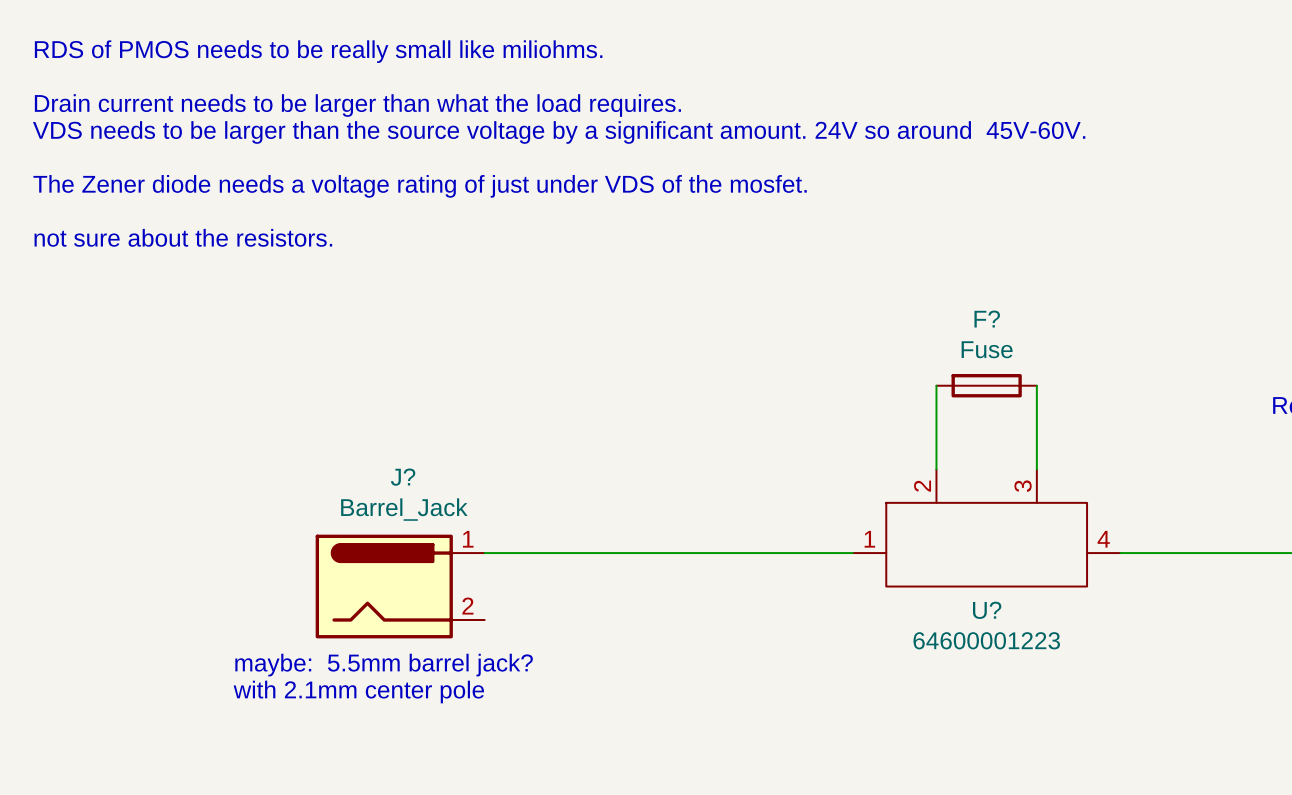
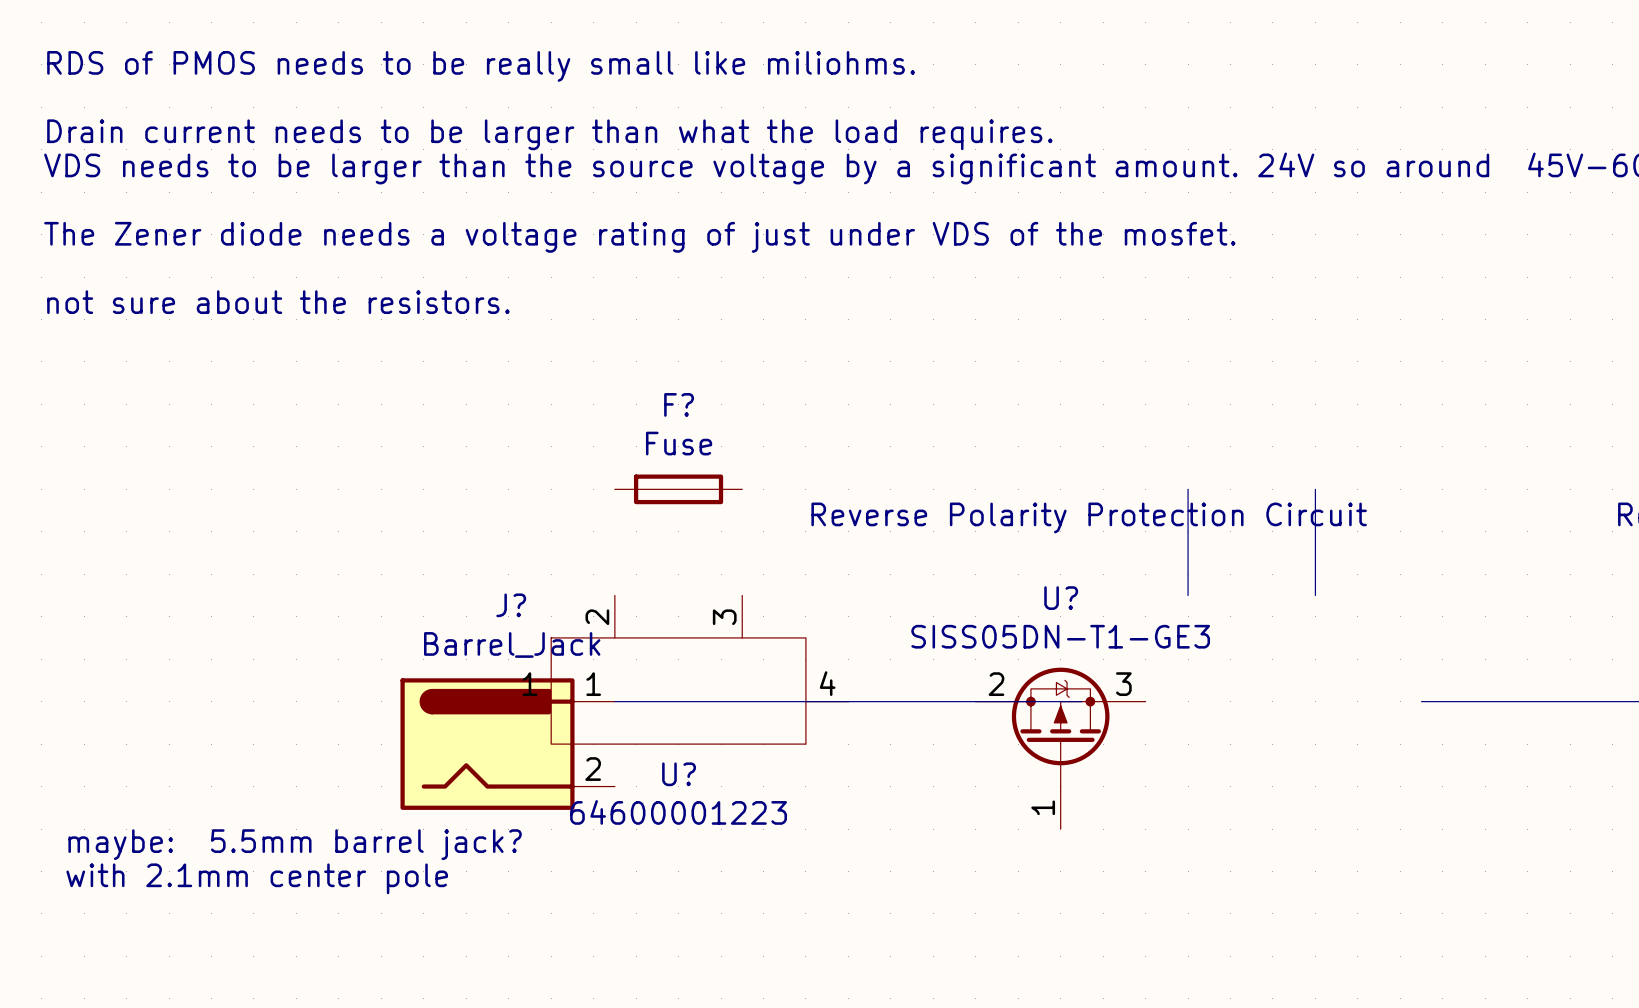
F?: none -> Fuse (678, 489)
F?: Fuse (986, 385) -> none
text: none -> Reverse Polarity Protection Circuit (1089, 517)
U?: none -> 64600001223 (678, 669)
U?: 64600001223 (986, 527) -> none
U?: none -> SISS05DN-T1-GE3 (1060, 748)
text position: maybe: 5.5mm barrel jack? (384, 665) -> maybe: 5.5mm barrel jack? (295, 844)
text position: with 2.1mm center pole (358, 692) -> with 2.1mm center pole (257, 878)

